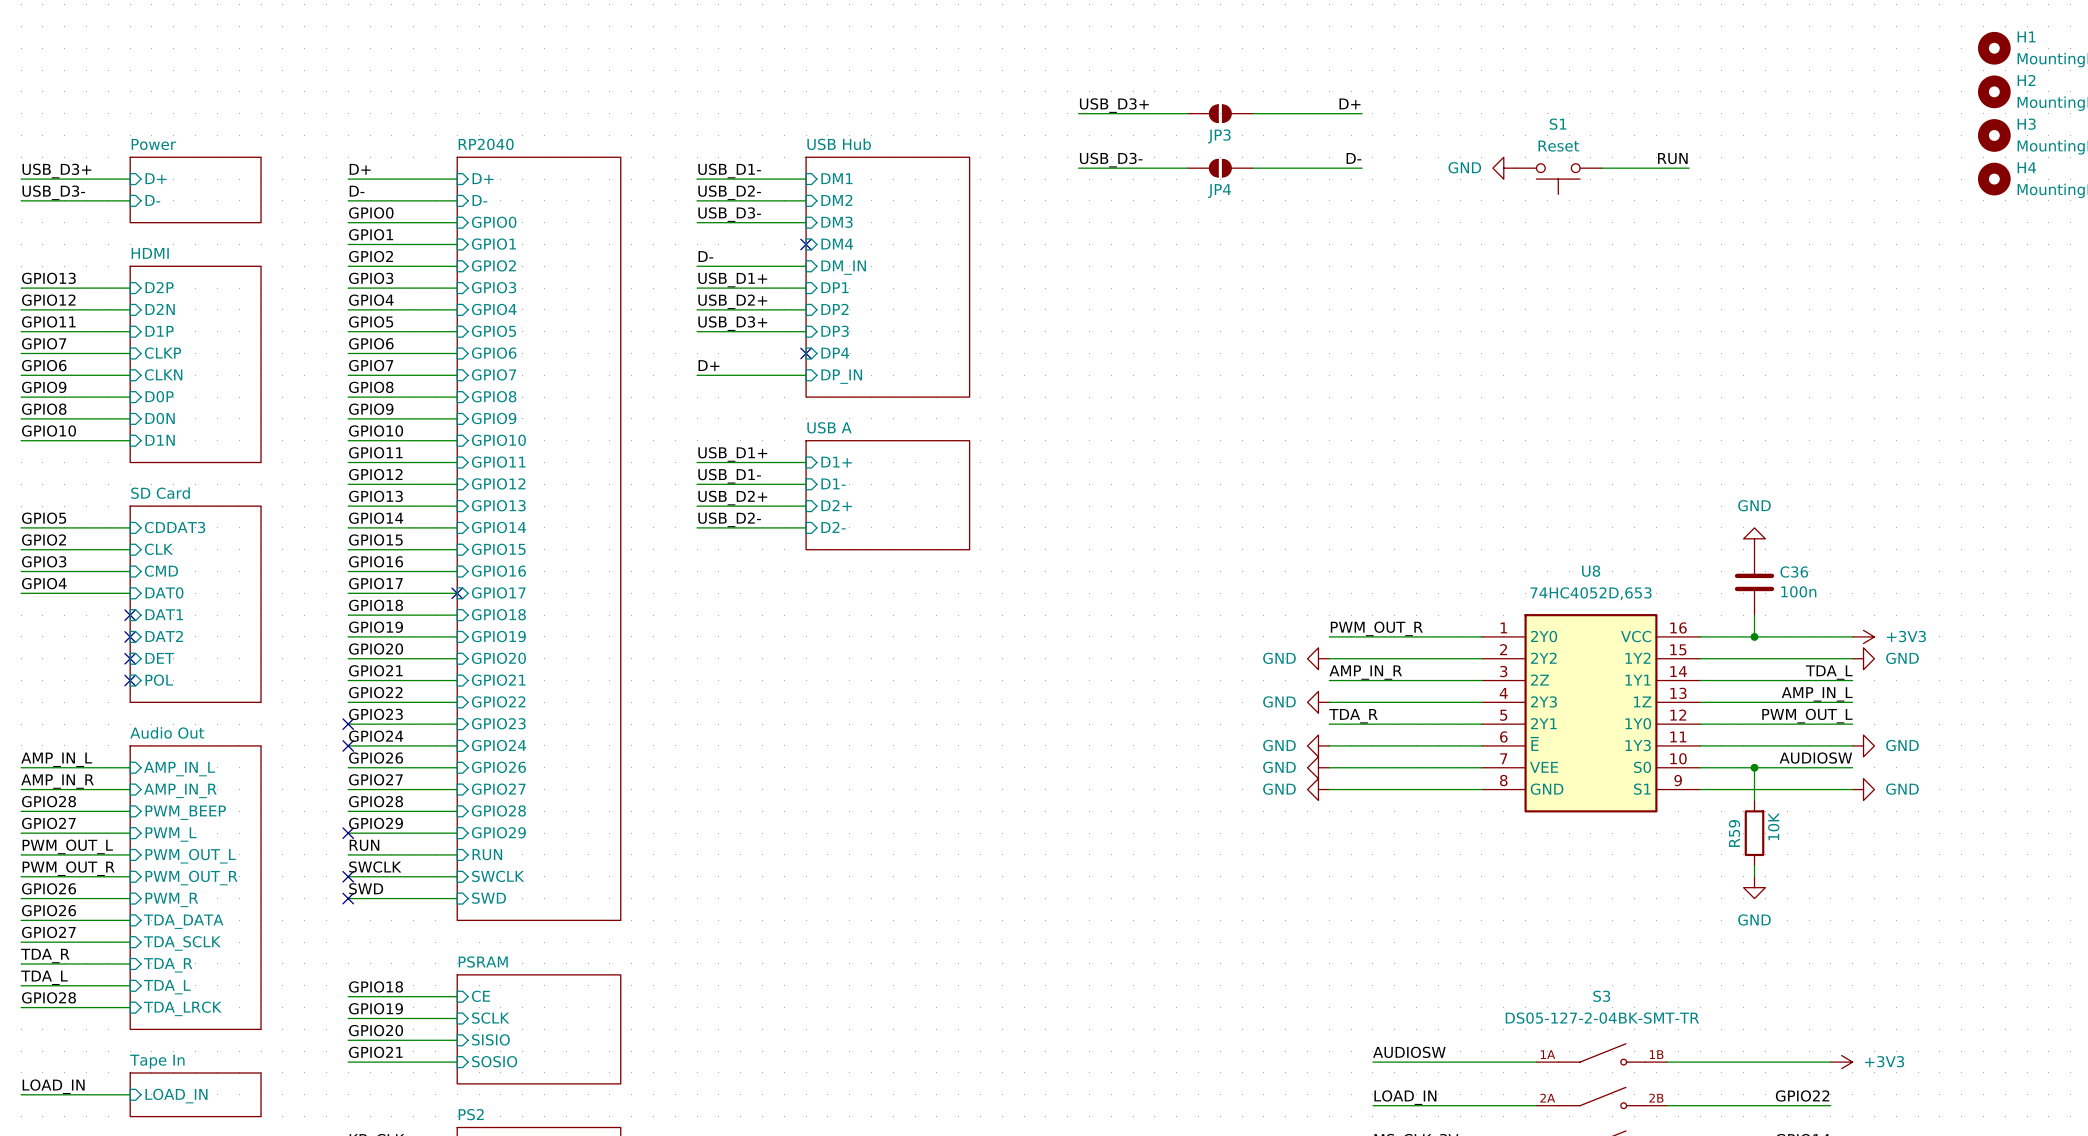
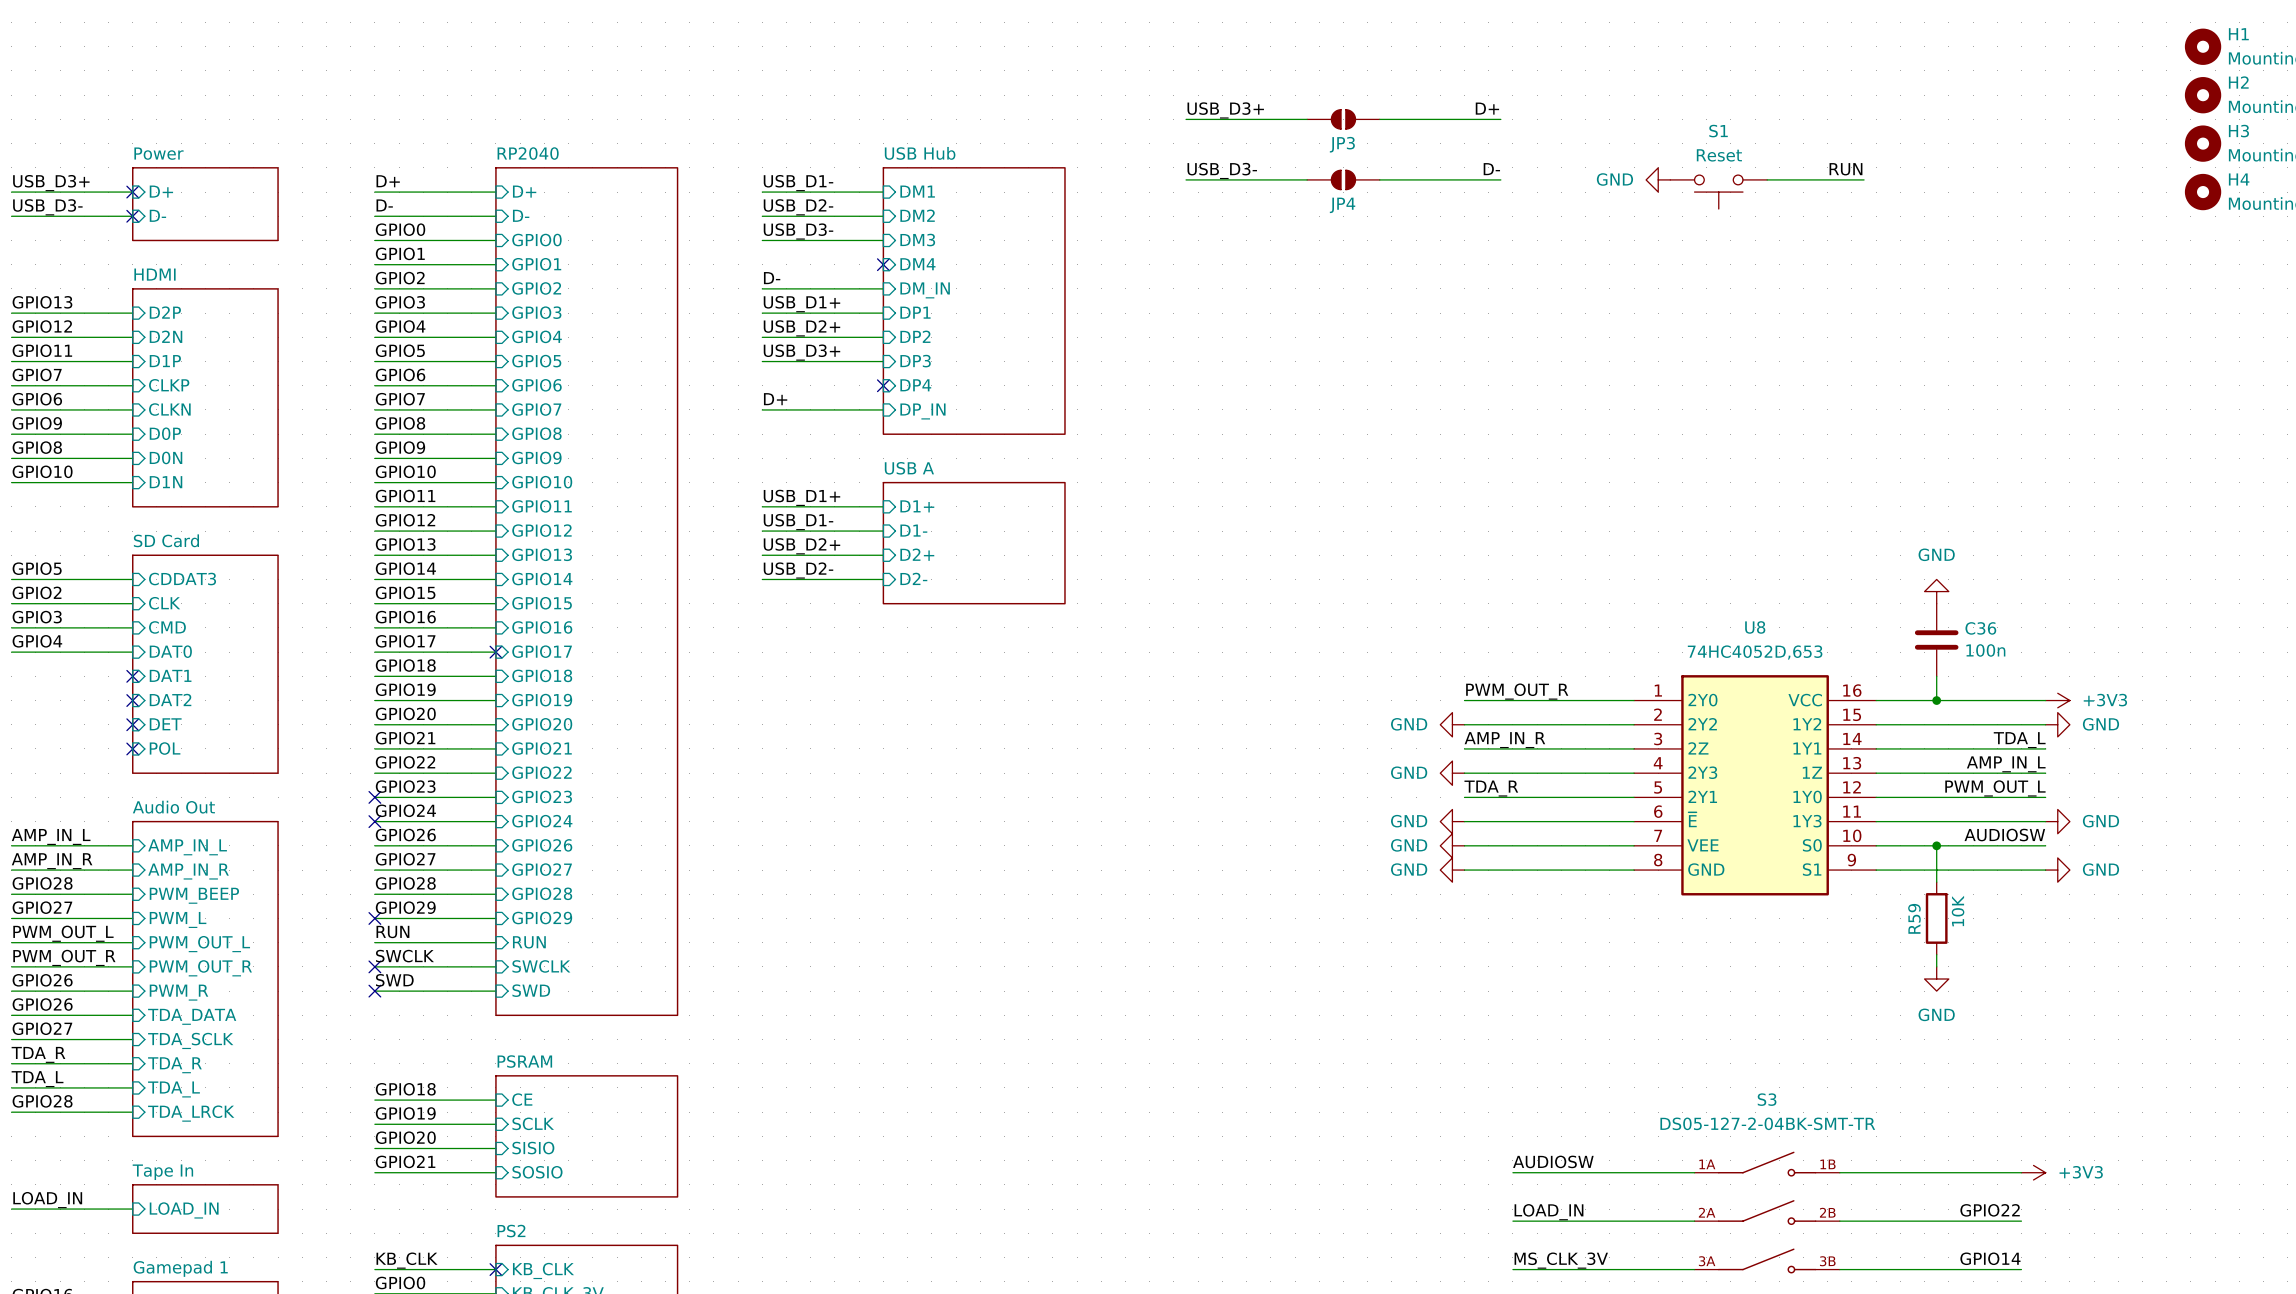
no-connect mark: none -> (132, 192)
no-connect mark: none -> (132, 216)

